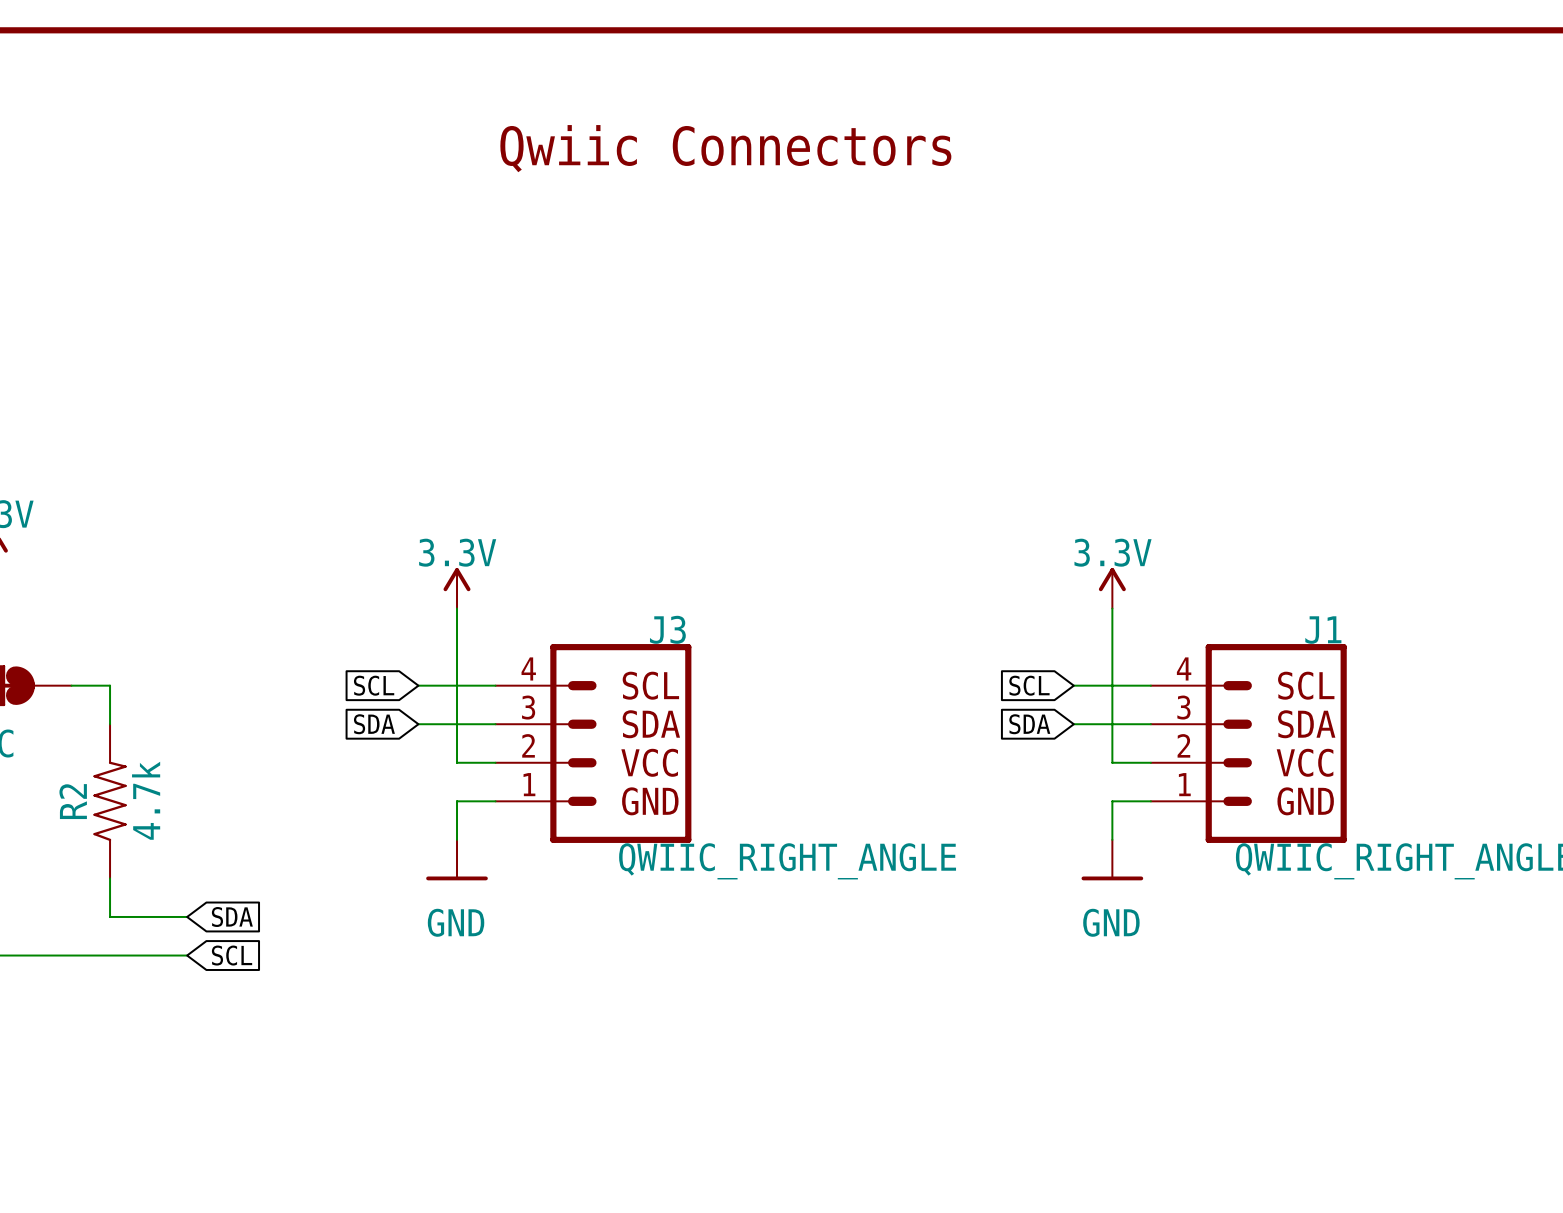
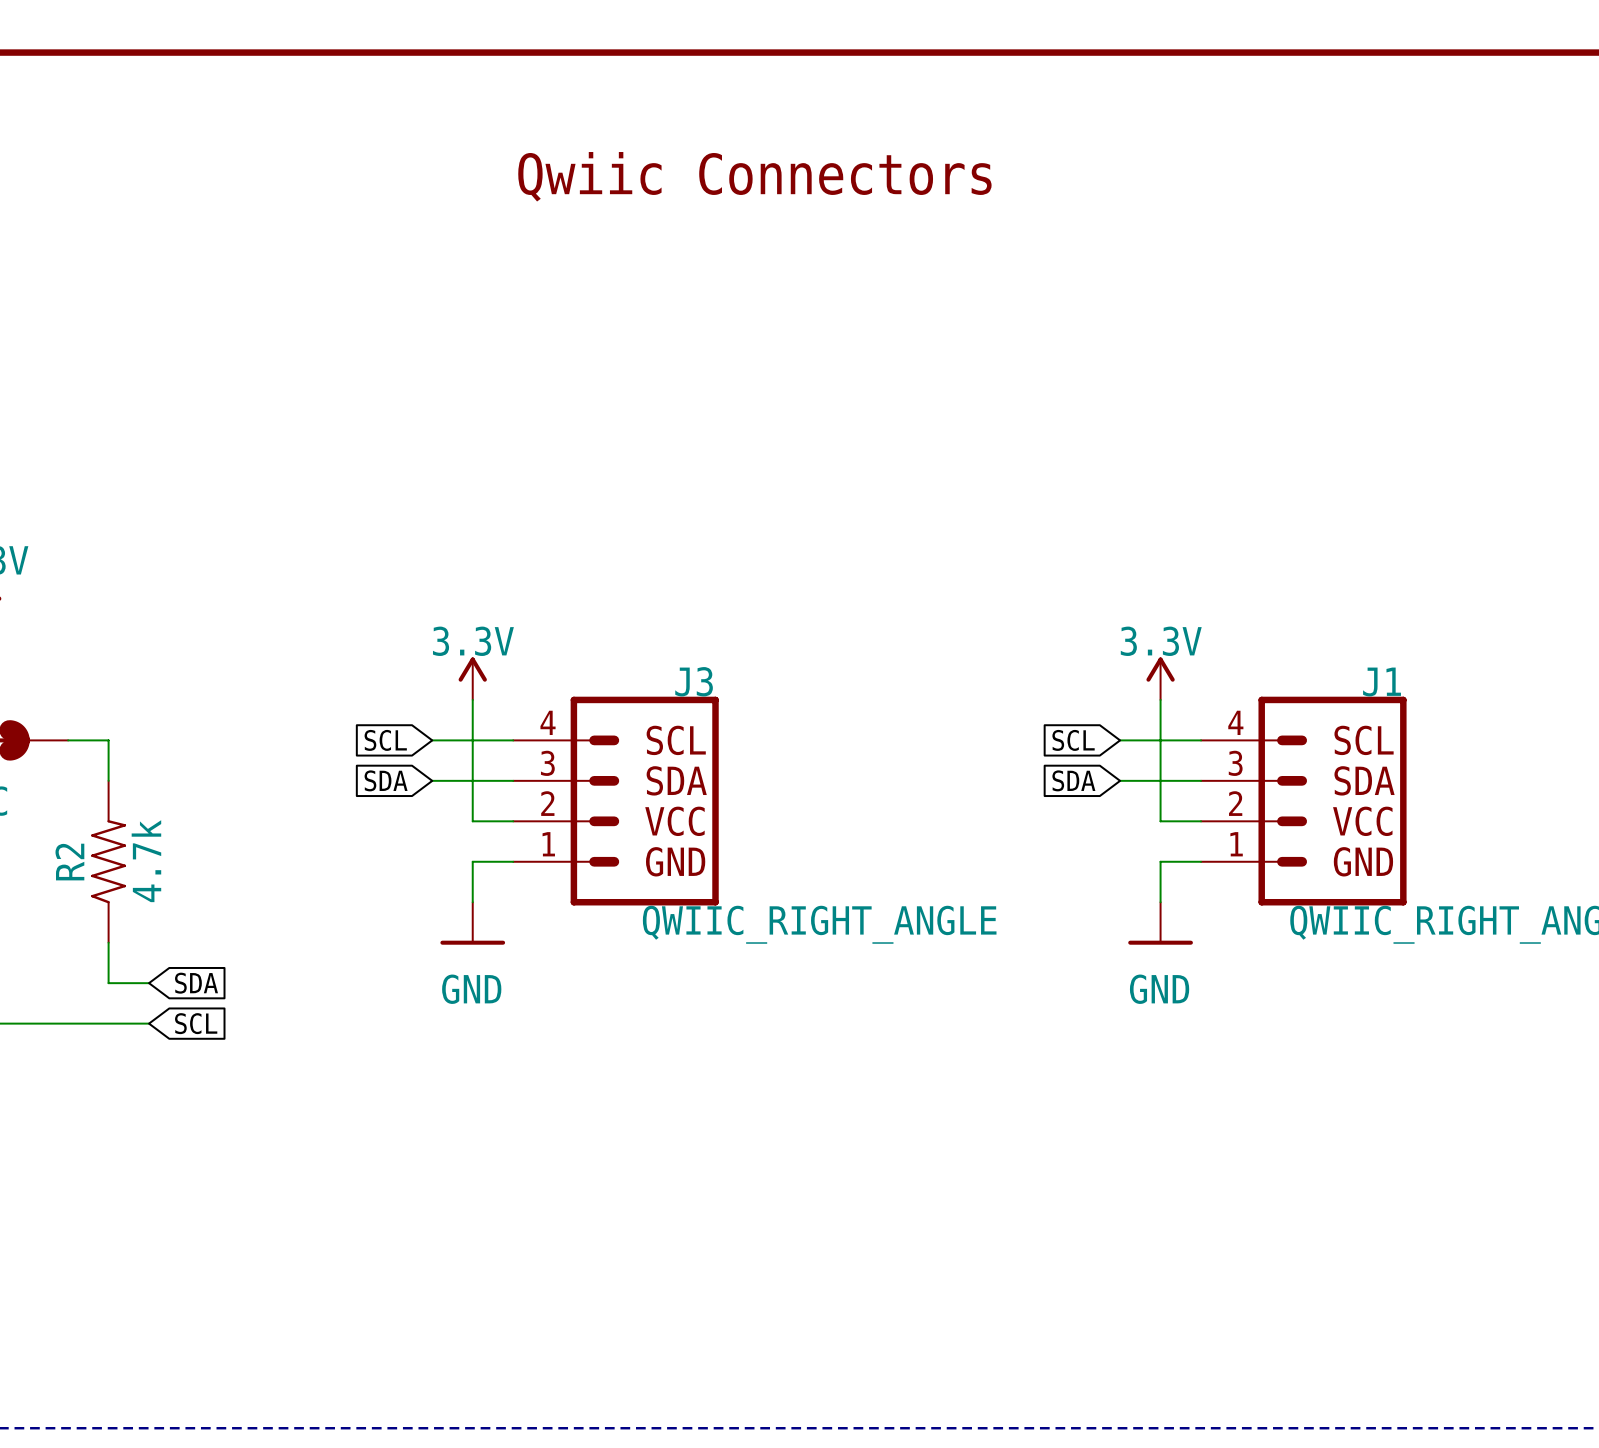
power symbol position: 3.3V (457, 588) -> 3.3V (472, 678)
power symbol position: 3.3V (1112, 588) -> 3.3V (1160, 678)
wire: (148, 916) (187, 916) -> none
global label position: SDA (232, 916) -> SDA (196, 983)
wire: (148, 955) (187, 955) -> none
global label position: SCL (232, 955) -> SCL (196, 1023)

